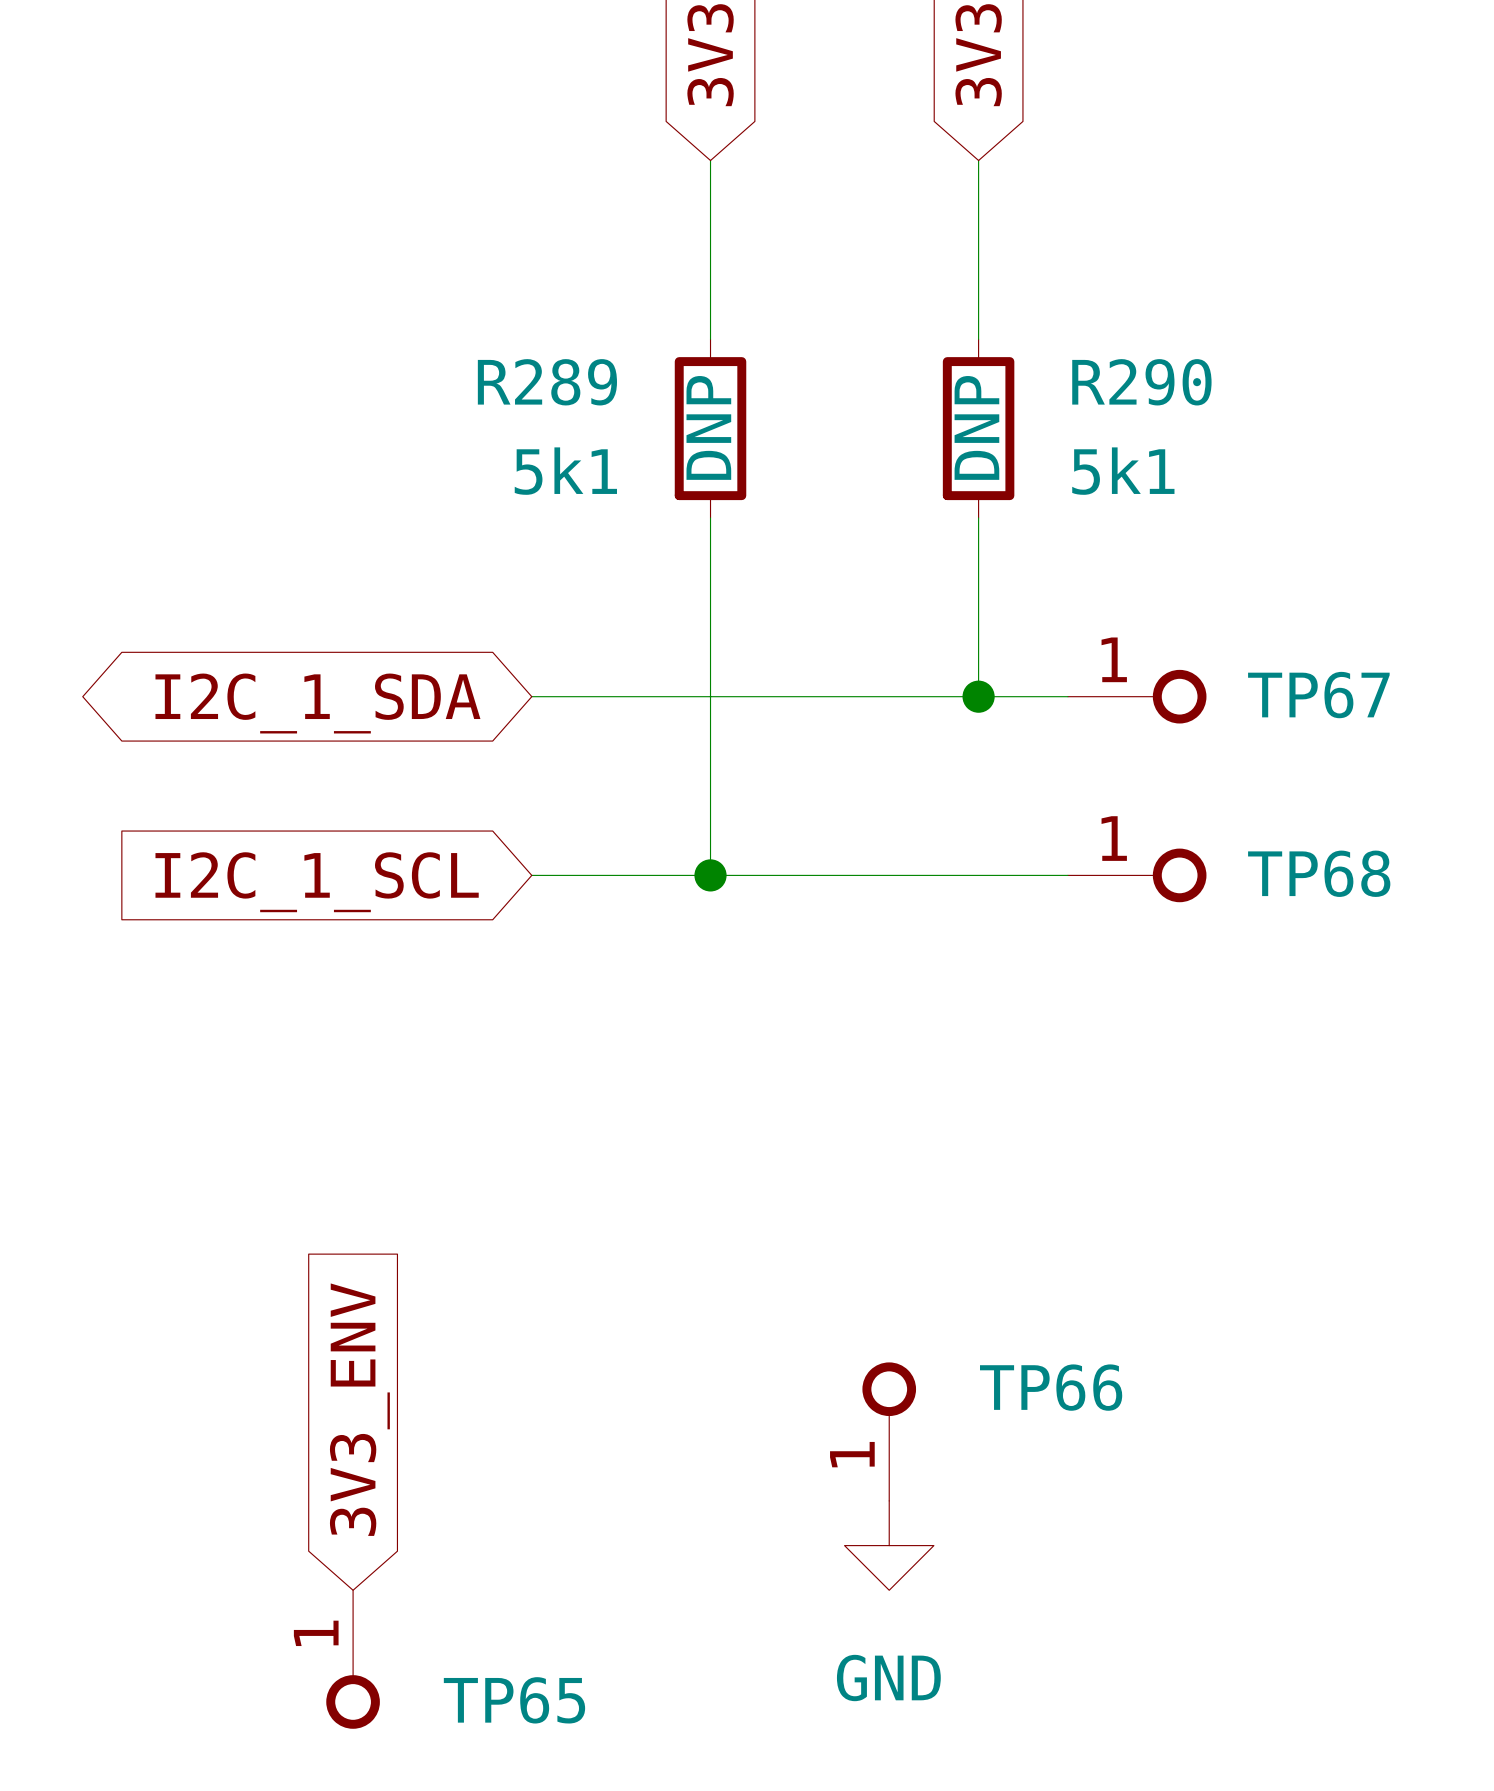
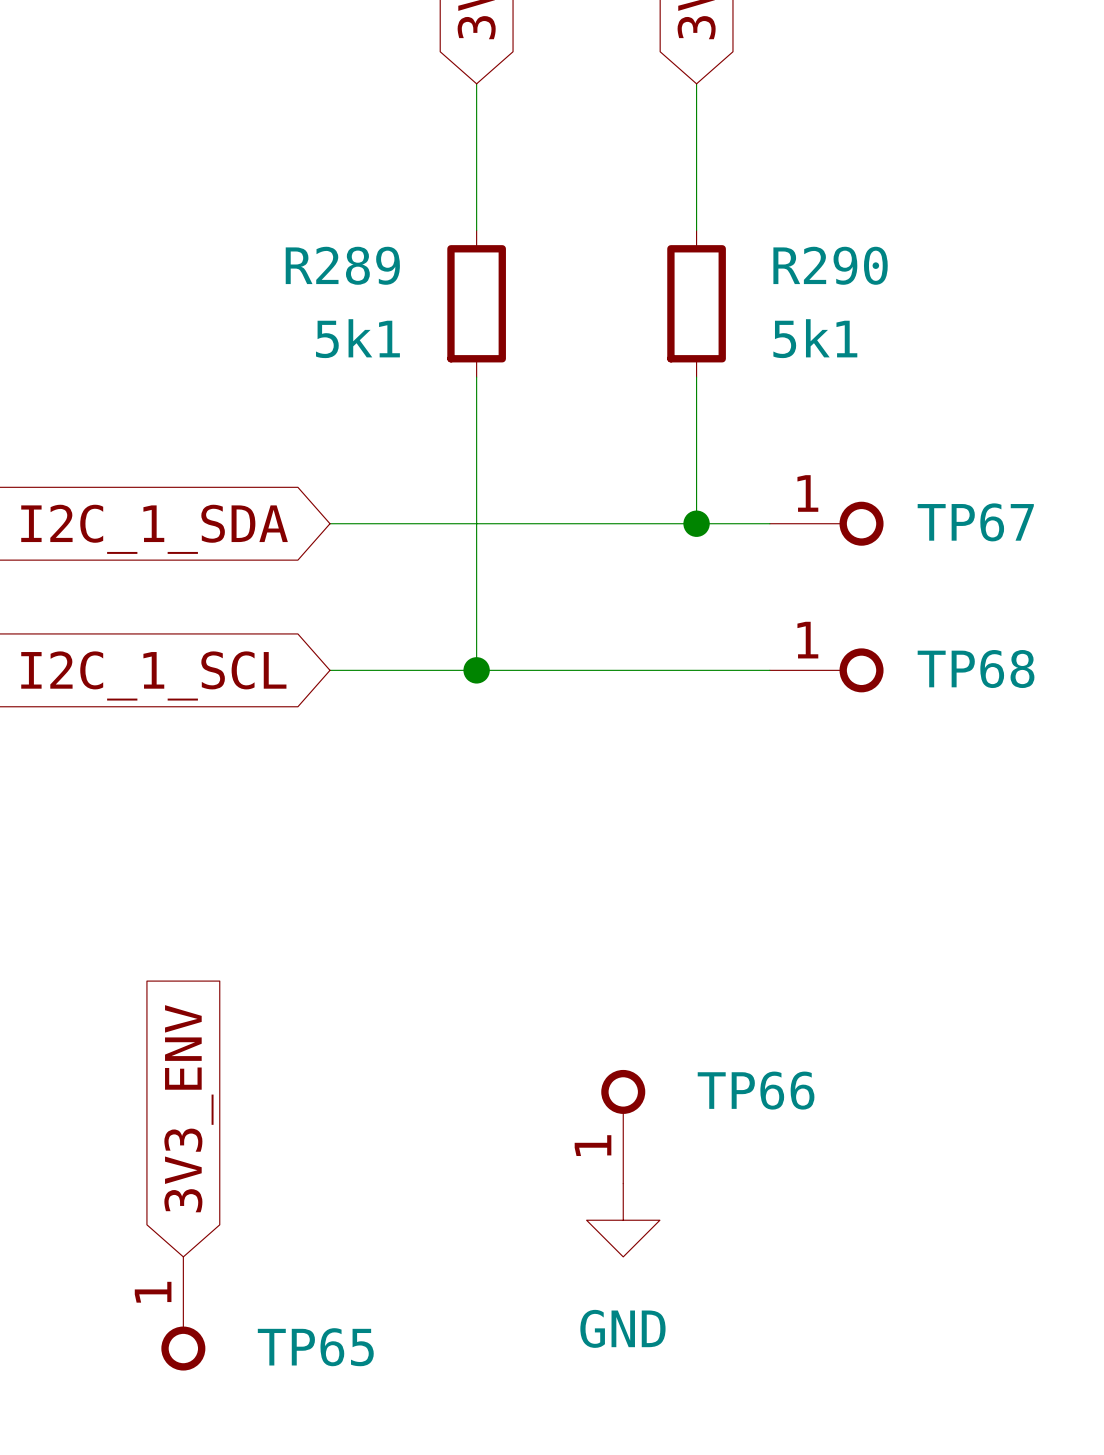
R289 text: DNP (708, 427) -> none
R290 text: DNP (976, 427) -> none

